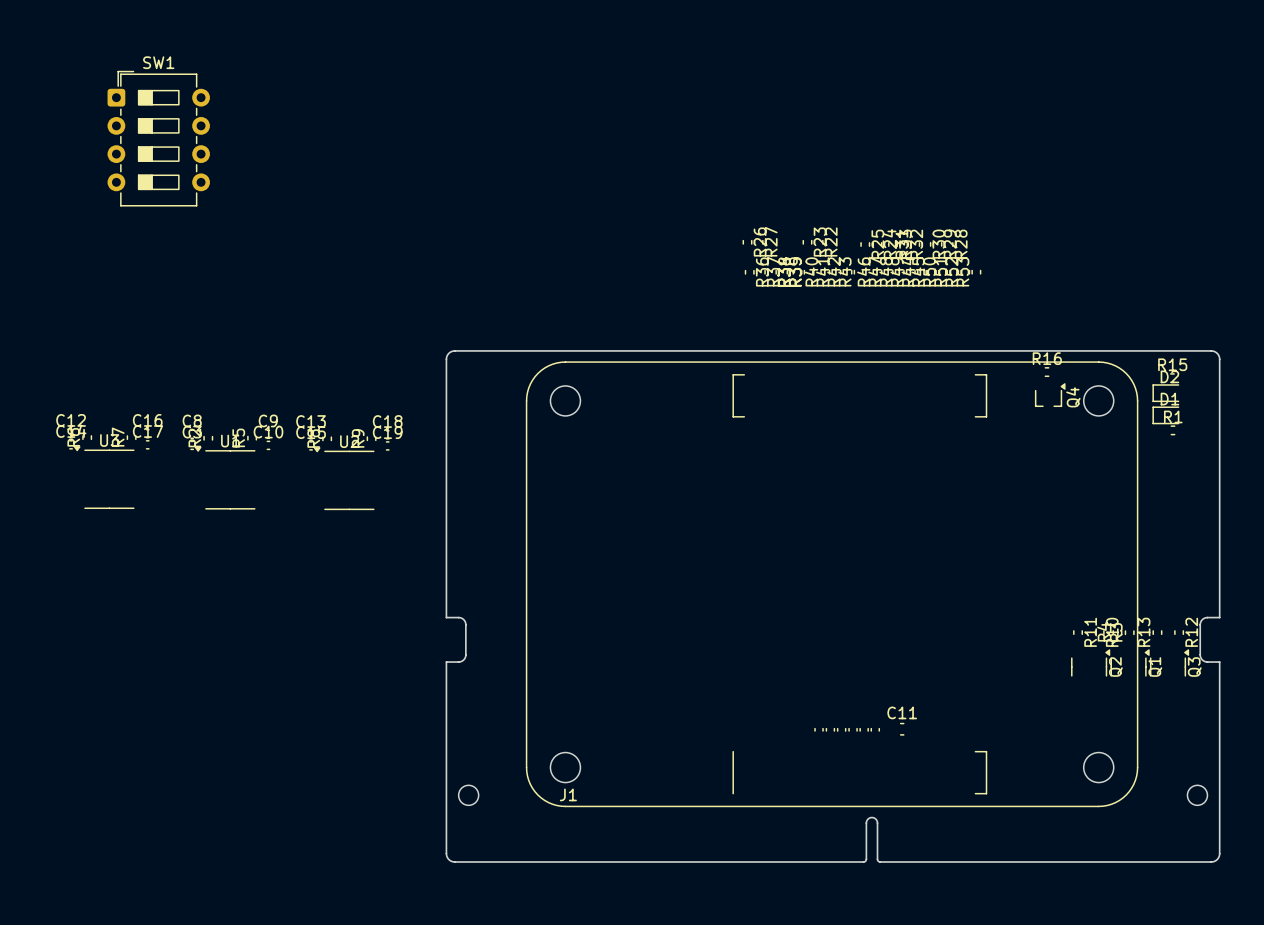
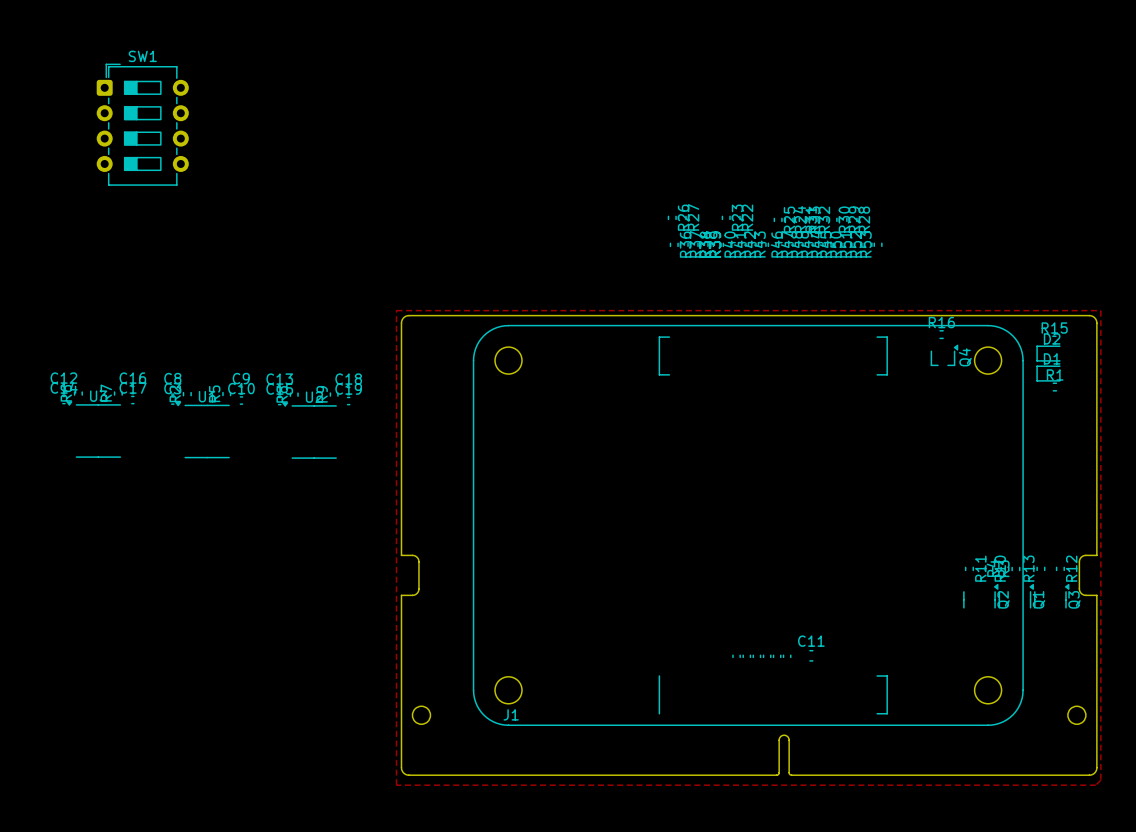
zone outline: none -> (396, 310) (1100, 310) (1100, 780) (1095, 785) (396, 785) (396, 310)

